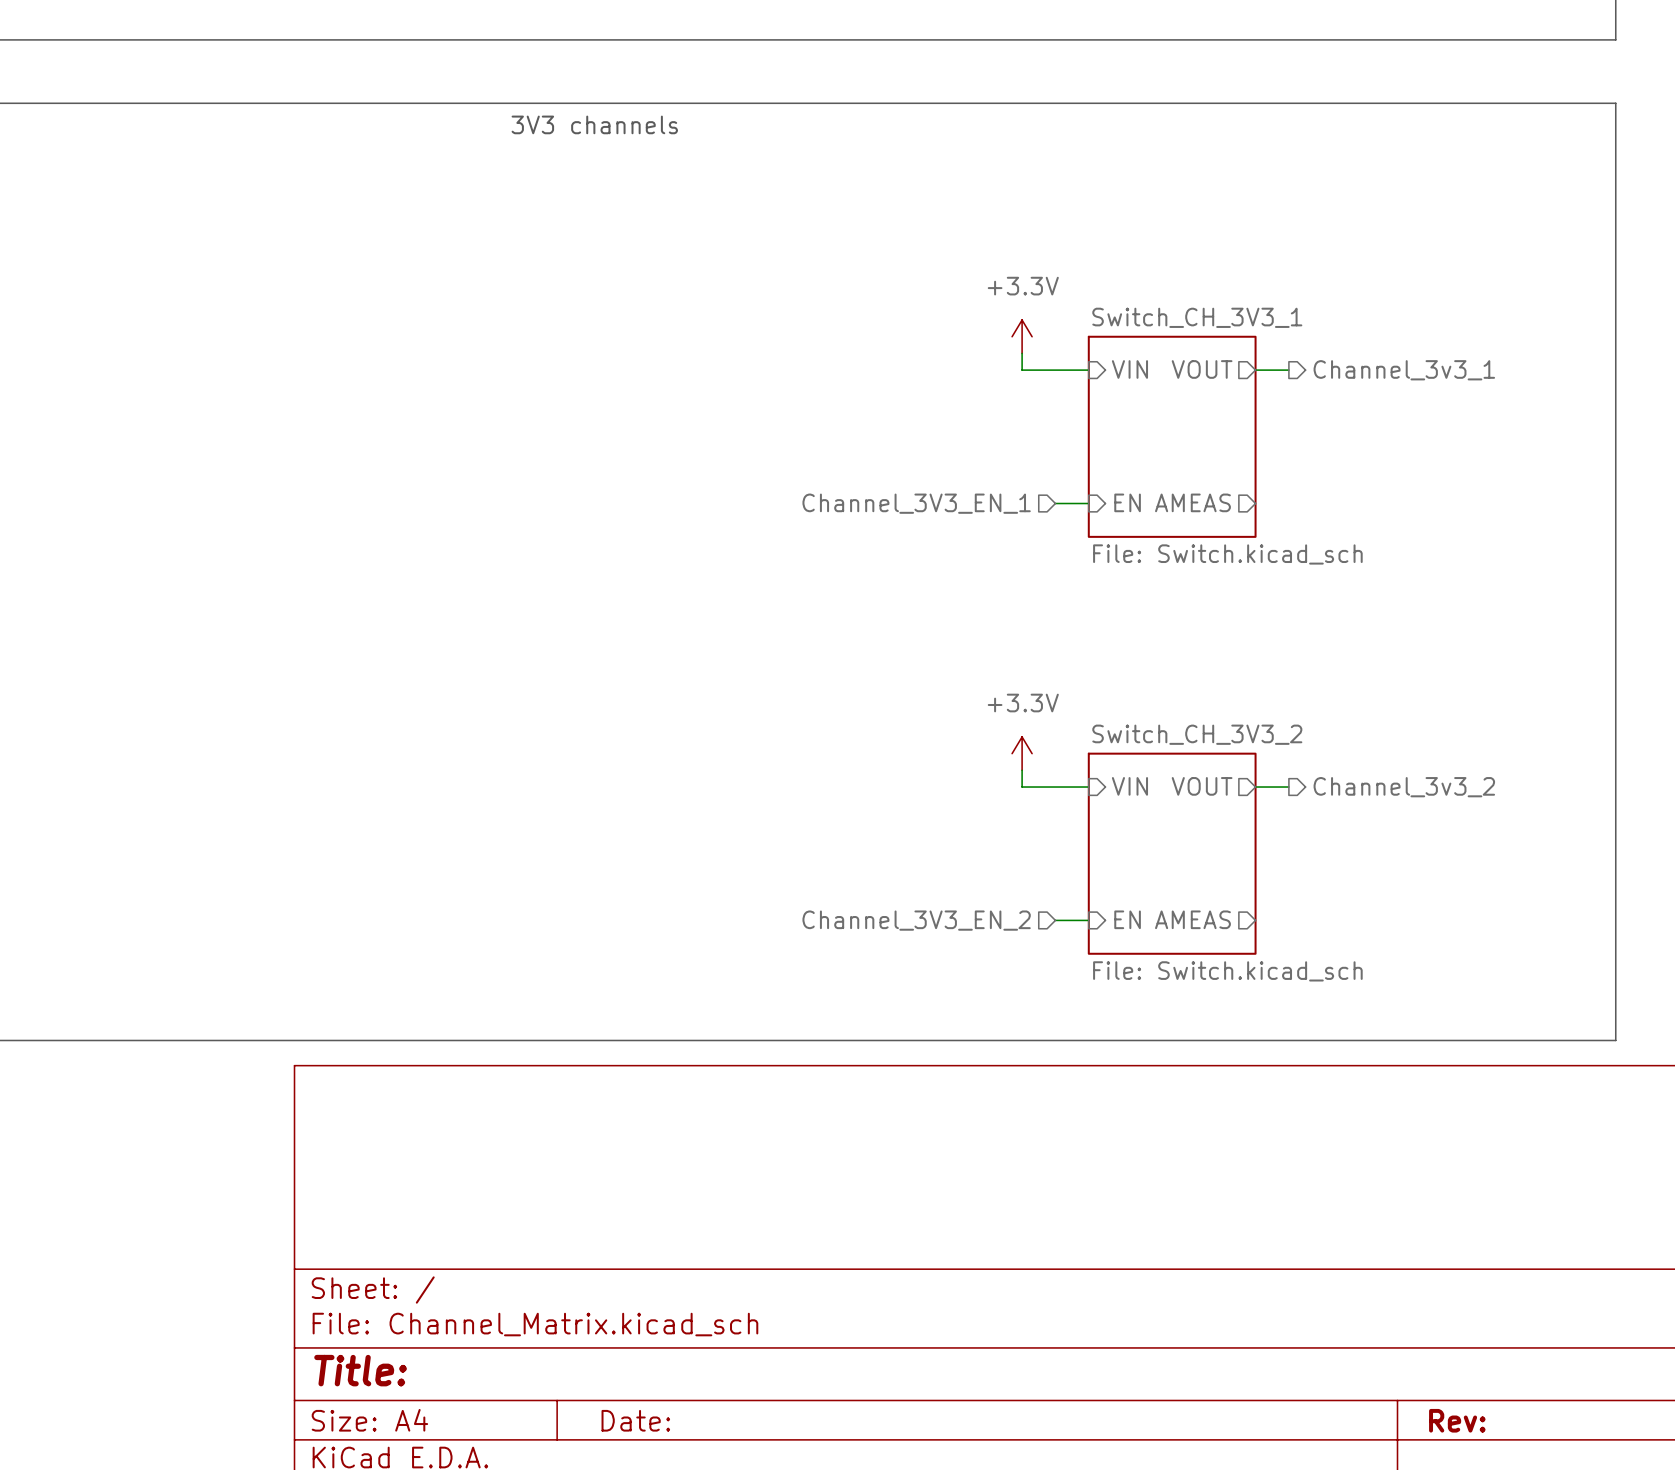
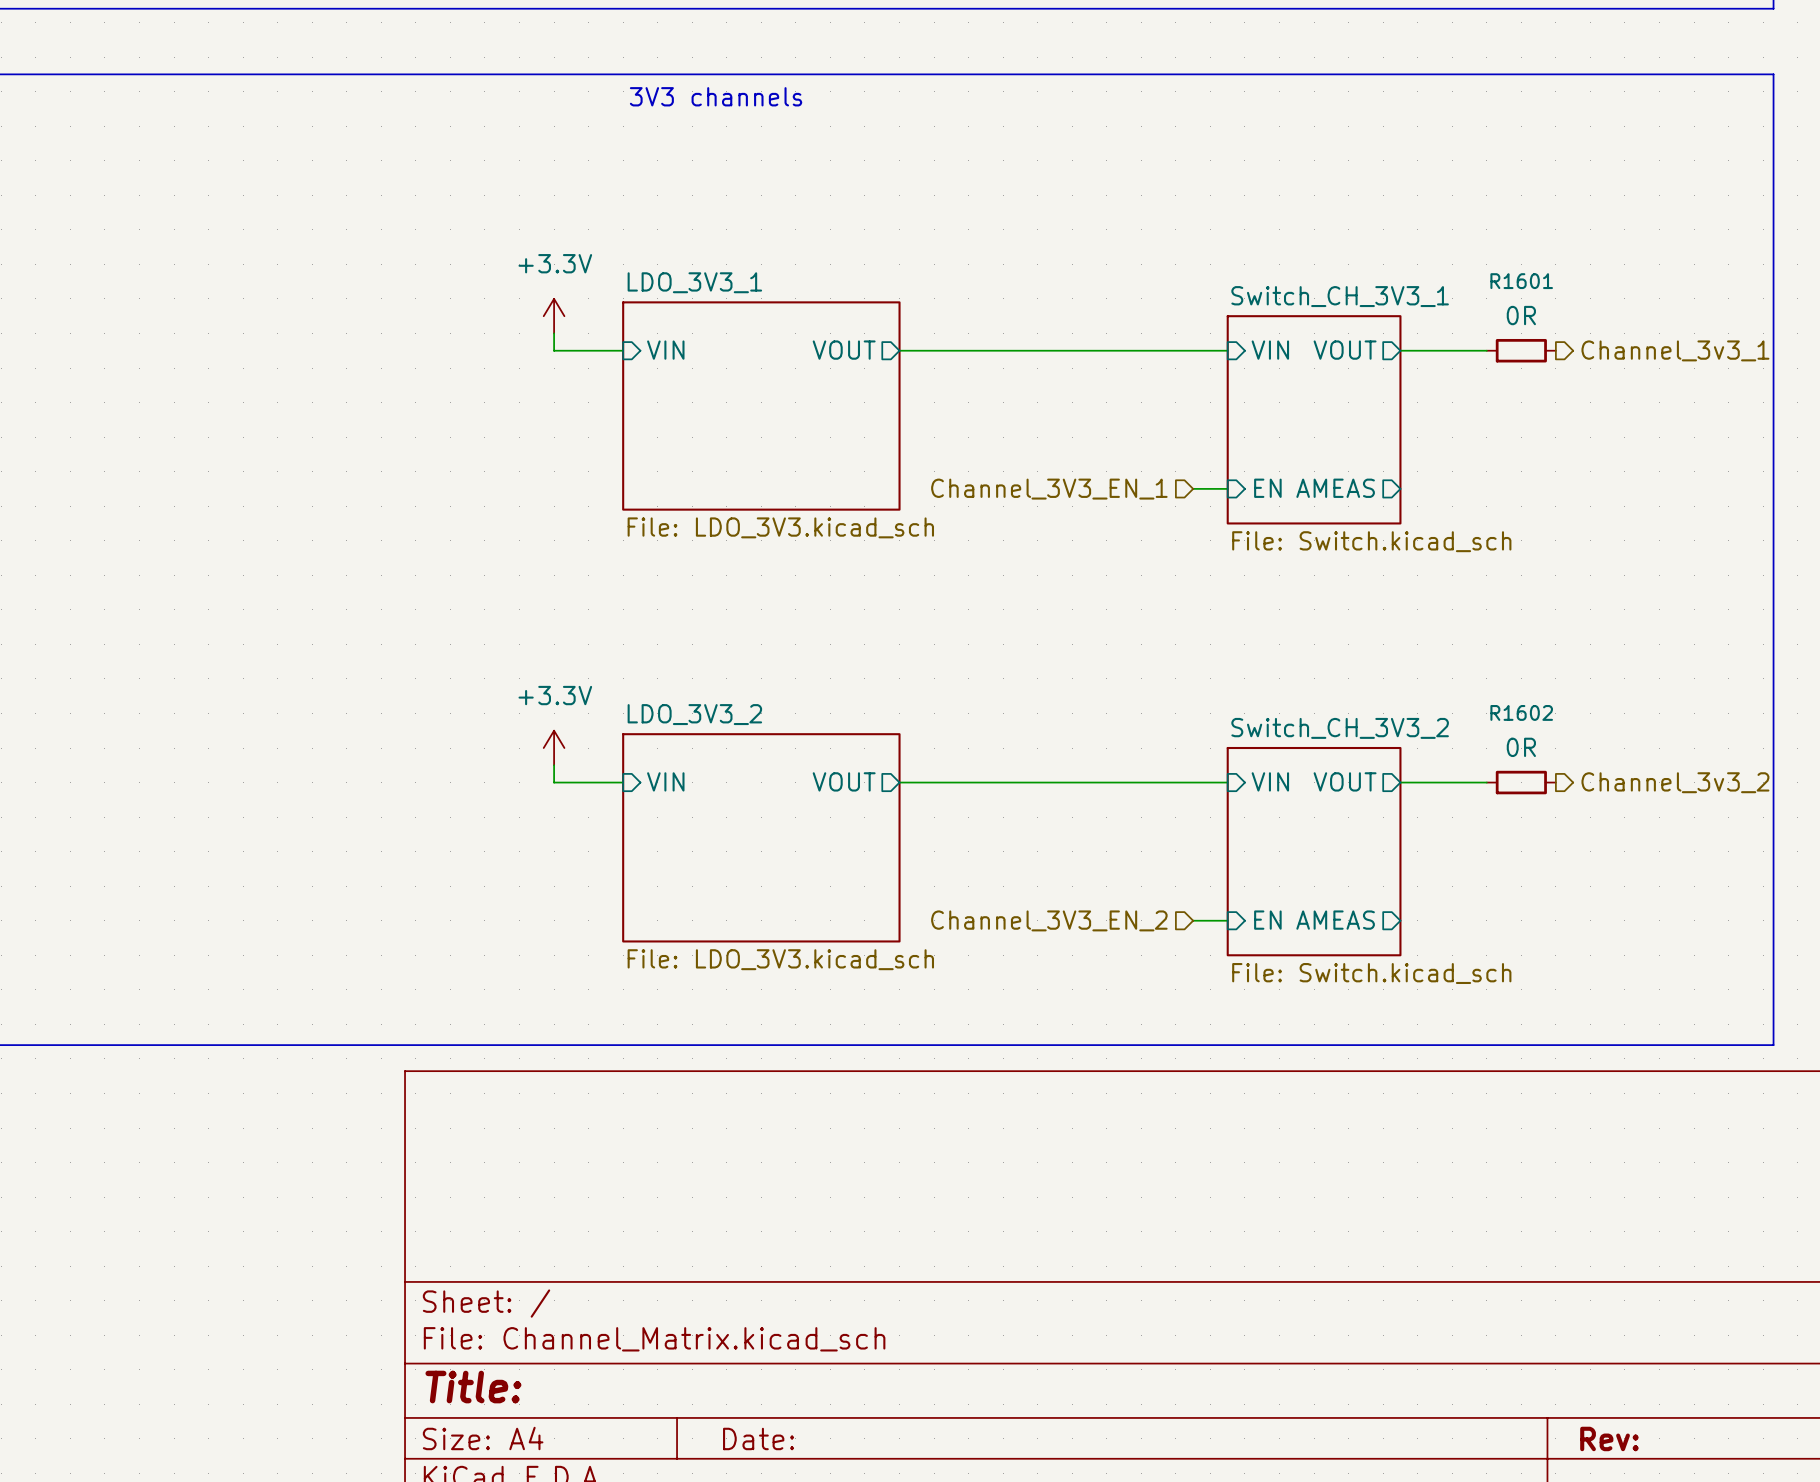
power symbol: none -> +3.3V (554, 316)
power symbol: +3.3V (1022, 336) -> none
wire: none -> (554, 333) (554, 350) (623, 350)
wire: (1022, 353) (1022, 370) -> (899, 350) (1158, 350)
sheet pin: none -> VIN (665, 350)
sheet pin: none -> VOUT (844, 350)
wire: none -> (1434, 350) (1486, 350)
R1601: none -> 0R (1521, 350)
hierarchical label position: Channel_3v3_1 (1404, 370) -> Channel_3v3_1 (1675, 350)
sheet LDO_3V3_1: none -> File: LDO_3V3.kicad_sch (761, 406)
power symbol: none -> +3.3V (554, 748)
power symbol: +3.3V (1022, 753) -> none
wire: none -> (554, 765) (554, 782) (623, 782)
wire: (1022, 770) (1022, 787) -> (899, 782) (1158, 782)
sheet pin: none -> VIN (665, 781)
sheet pin: none -> VOUT (844, 781)
wire: none -> (1434, 782) (1486, 782)
R1602: none -> 0R (1521, 782)
hierarchical label position: Channel_3v3_2 (1404, 787) -> Channel_3v3_2 (1675, 782)
sheet LDO_3V3_2: none -> File: LDO_3V3.kicad_sch (761, 837)

